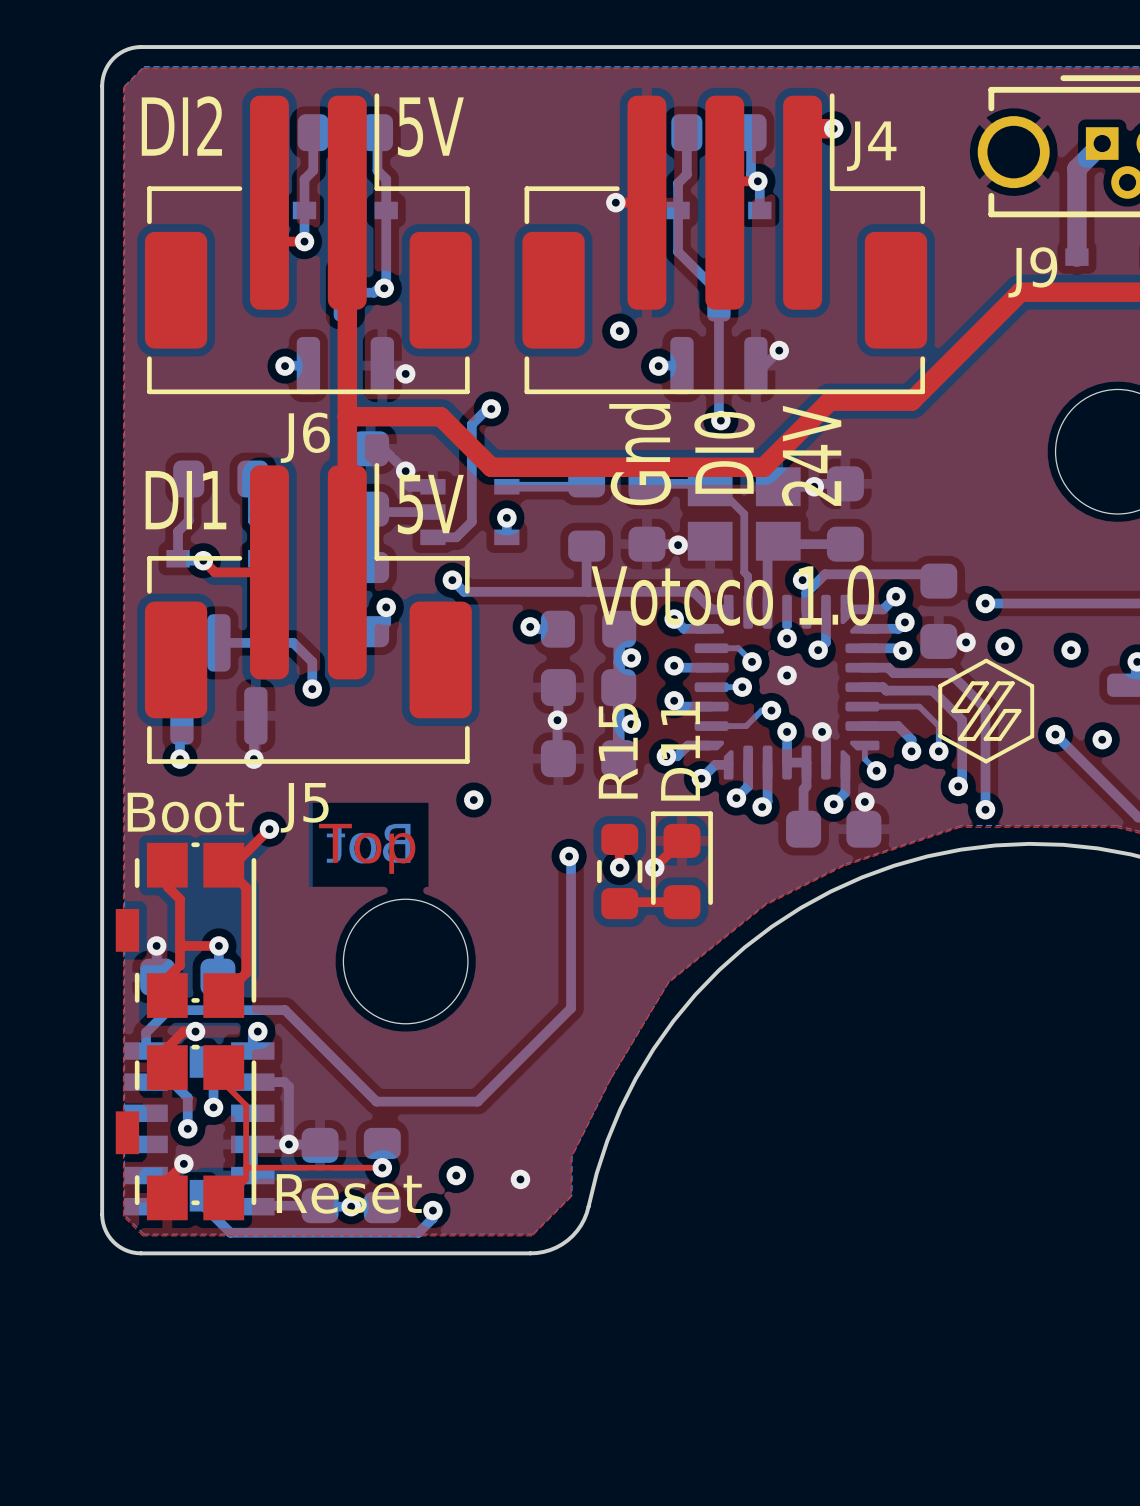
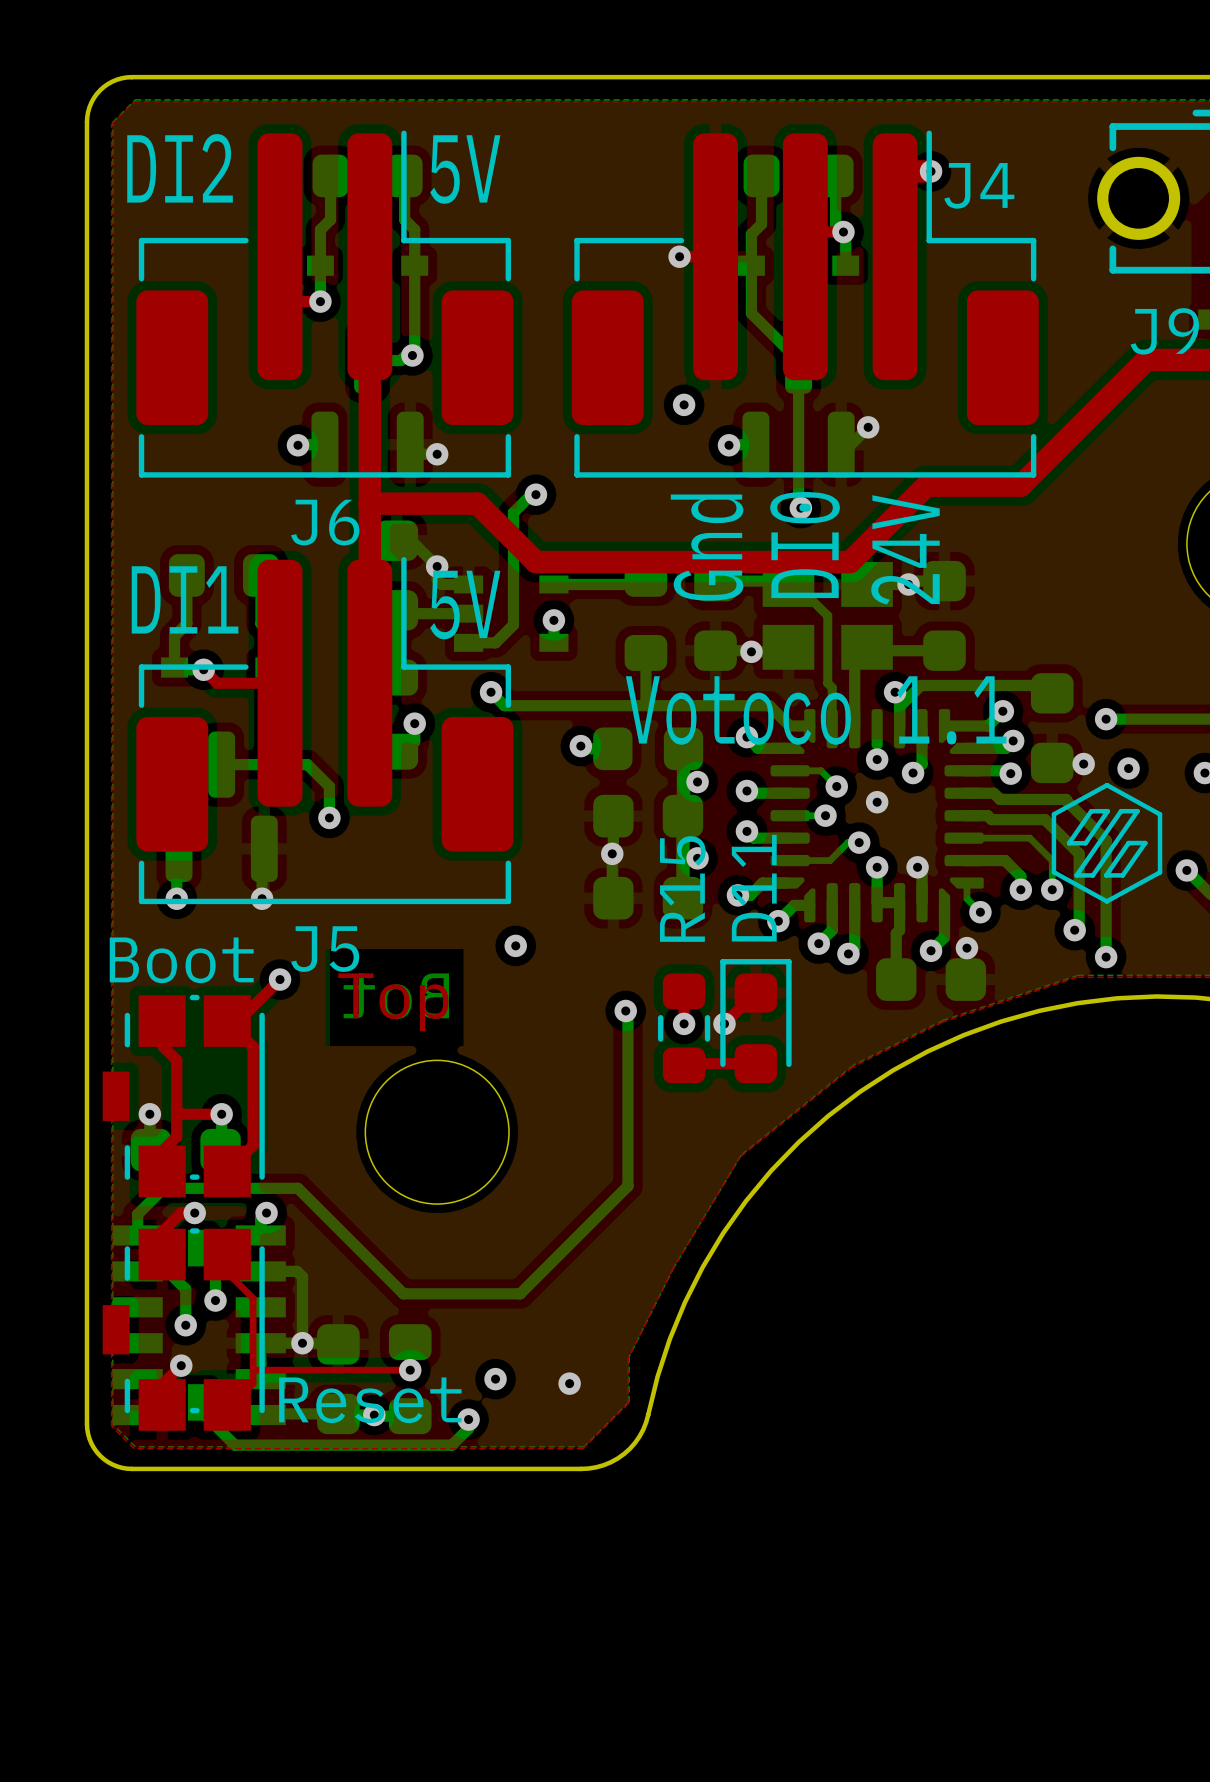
text: Votoco 1.0 (732, 595) -> Votoco 1.1 (816, 710)

